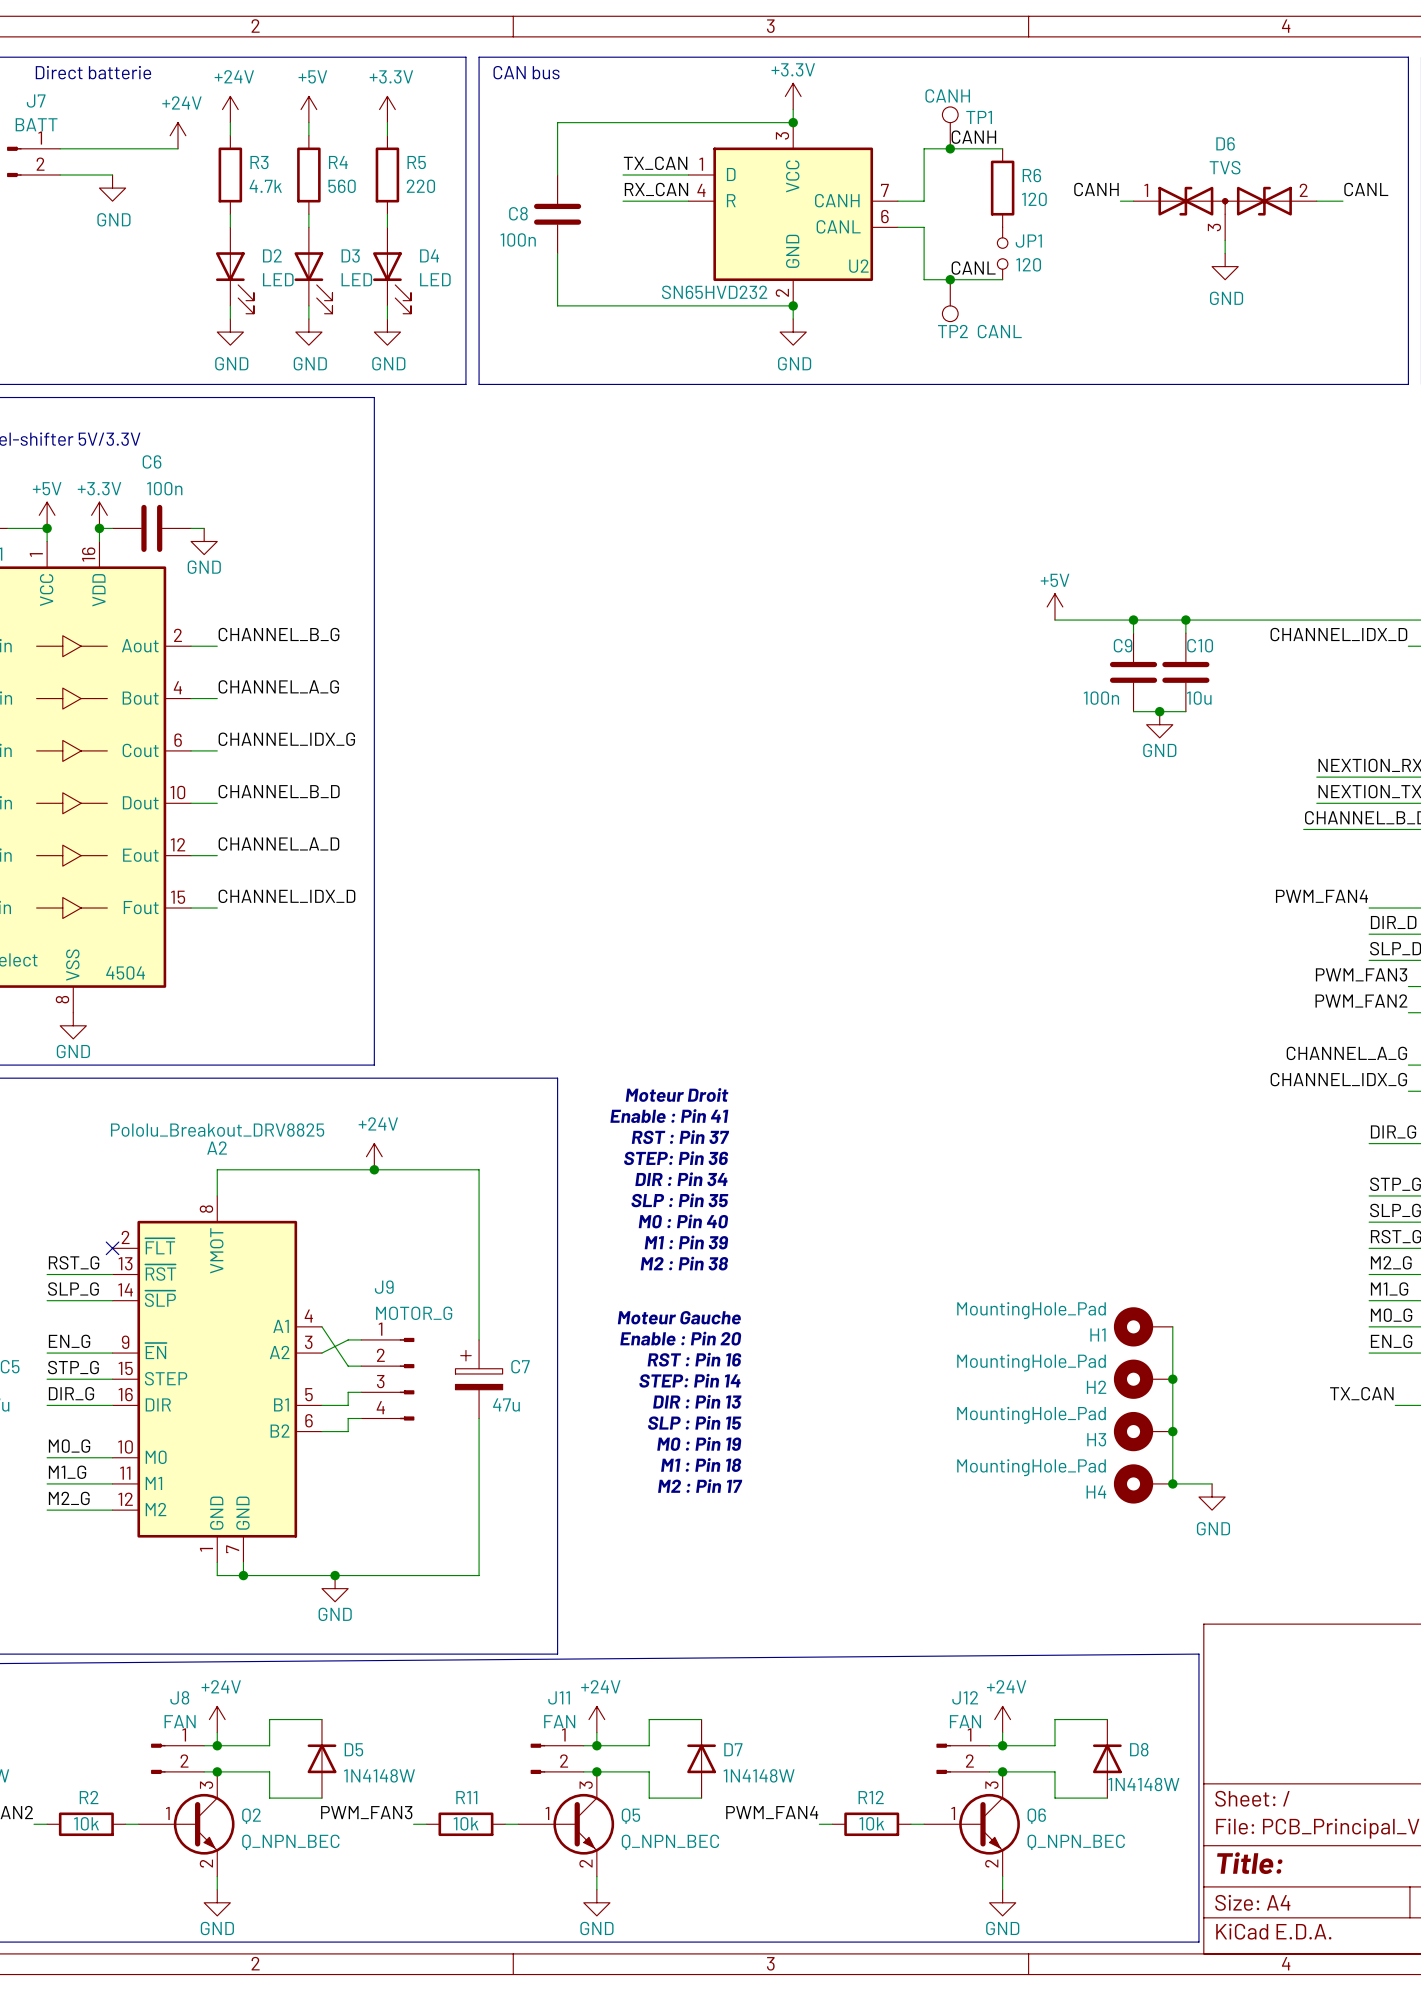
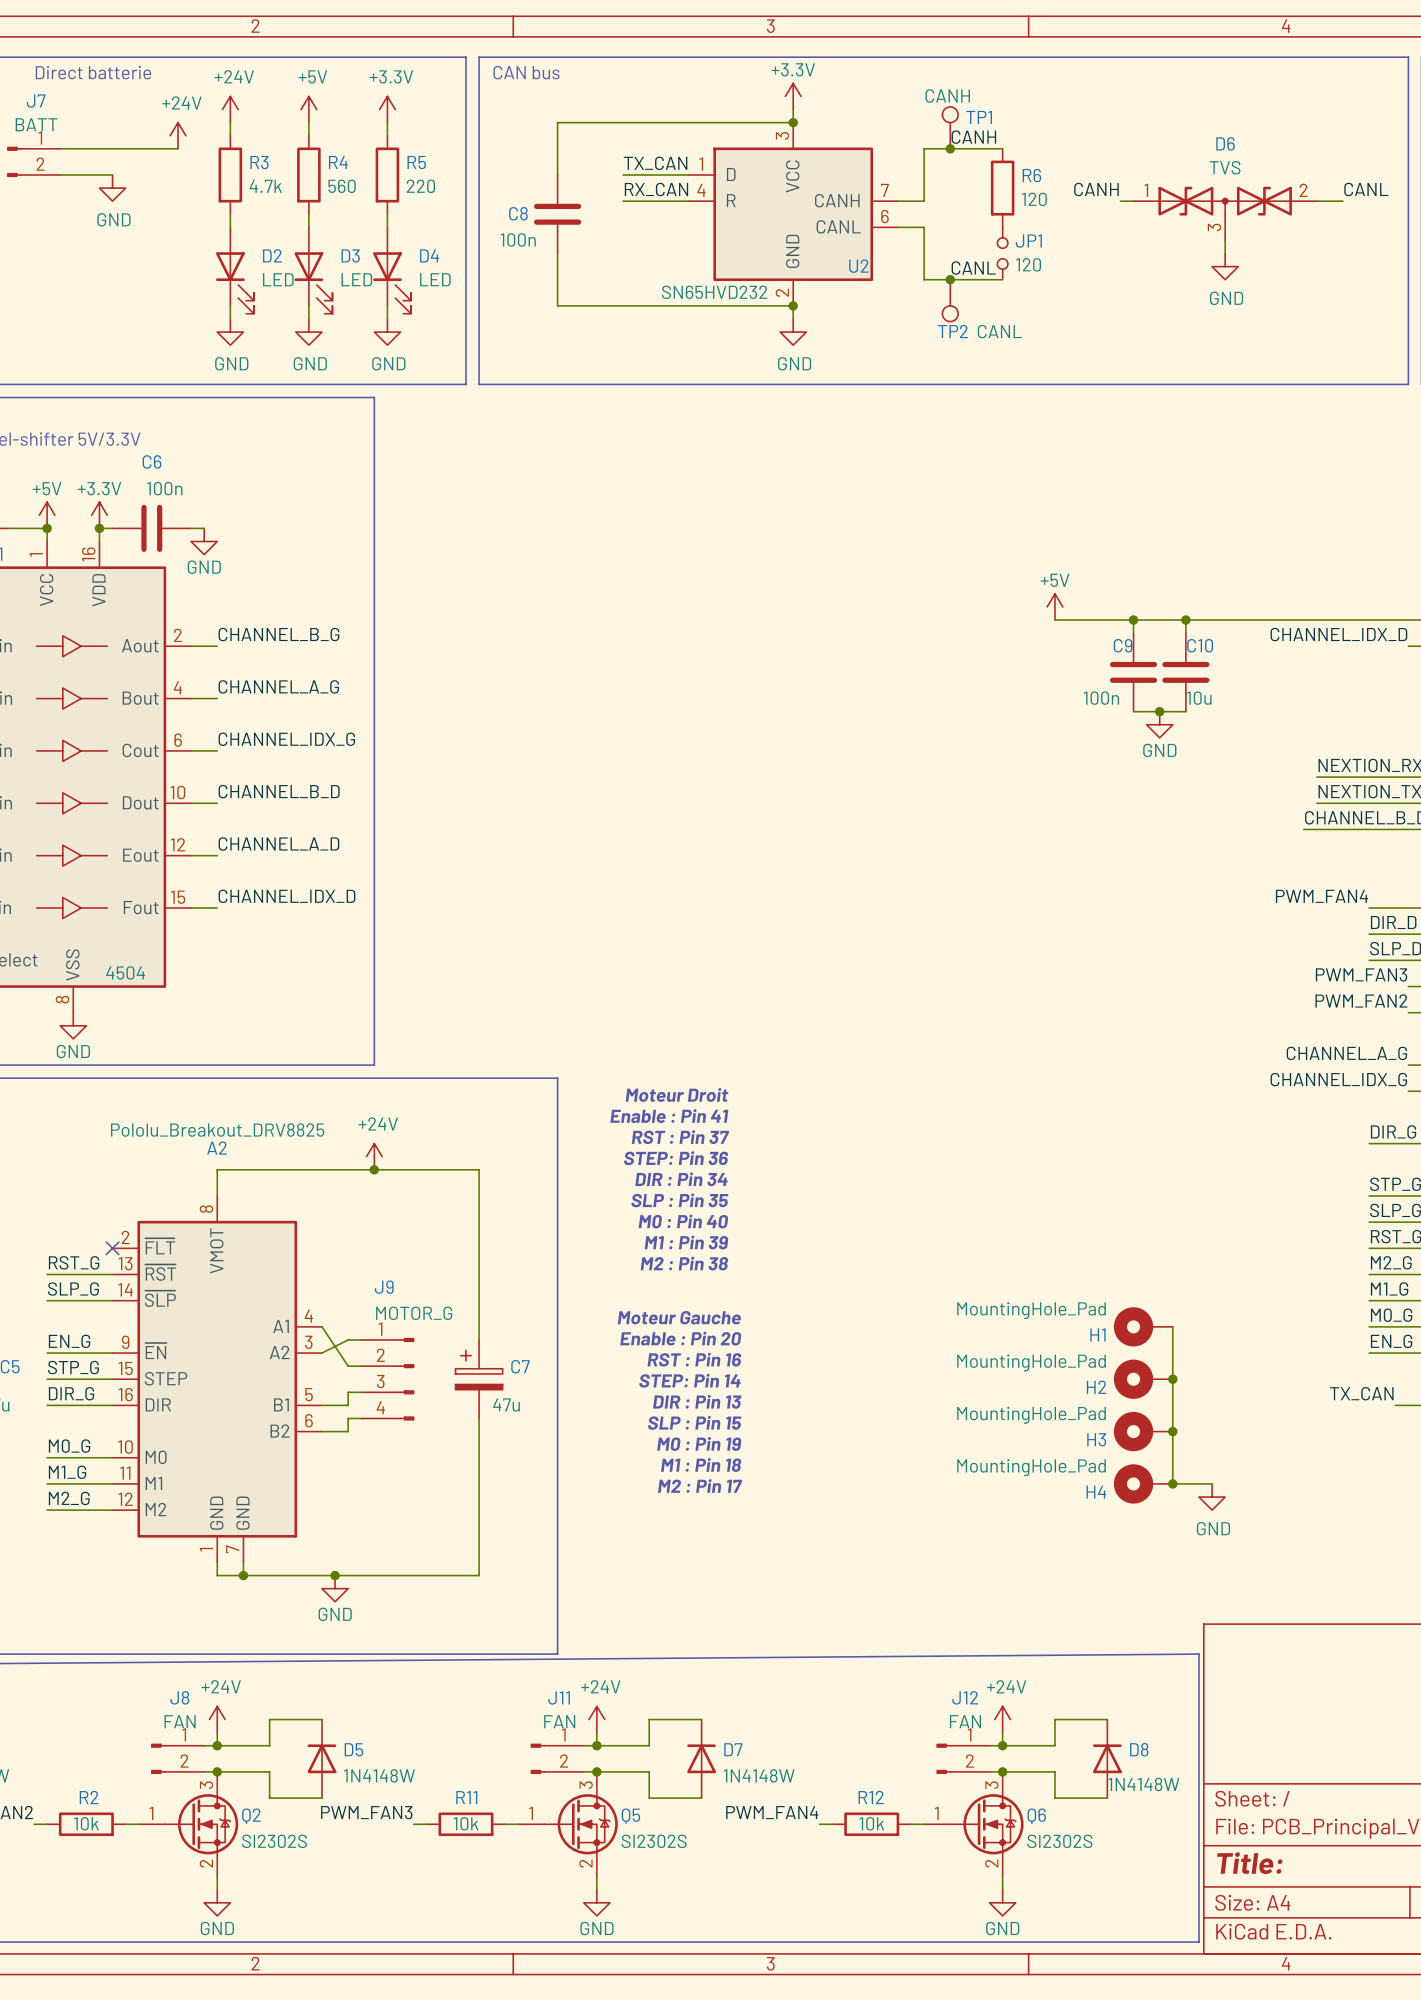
Q2 symbol: [138, 1771, 235, 1877] -> [138, 1771, 239, 1877]
Q5 symbol: [518, 1771, 615, 1877] -> [518, 1771, 618, 1877]
Q6 symbol: [924, 1771, 1020, 1877] -> [924, 1771, 1024, 1877]
Q2 value: Q_NPN_BEC (290, 1842) -> SI2302S (274, 1841)
Q5 value: Q_NPN_BEC (670, 1842) -> SI2302S (654, 1841)
Q6 value: Q_NPN_BEC (1076, 1842) -> SI2302S (1059, 1841)

